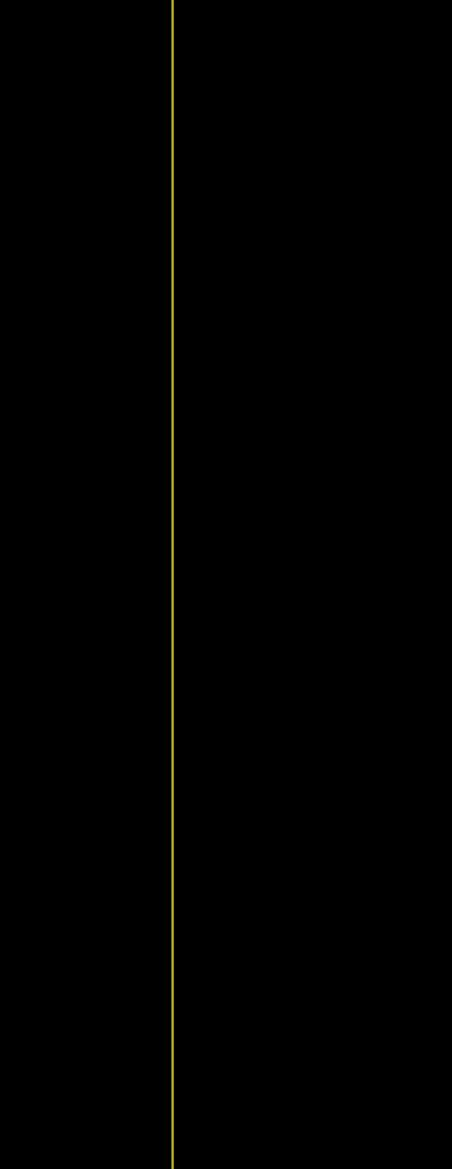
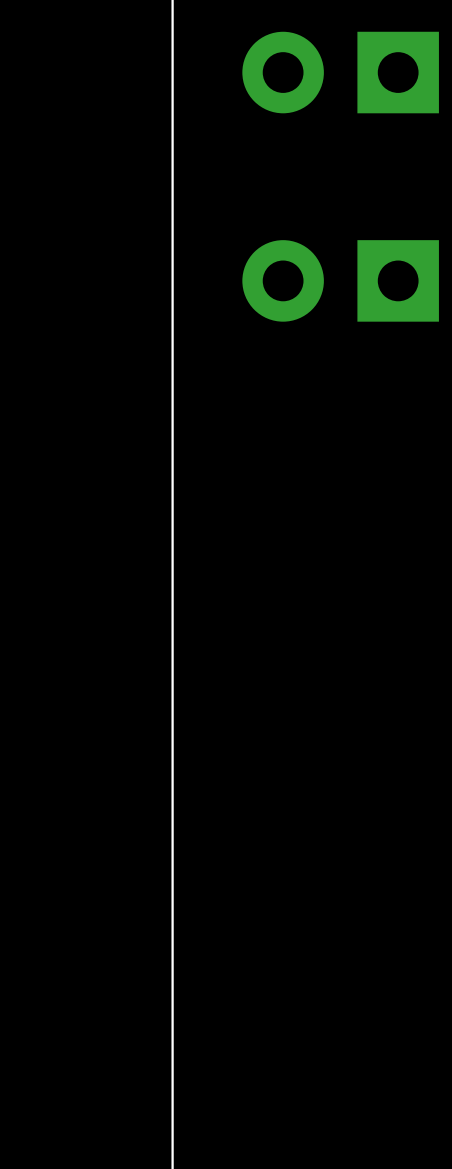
part: none -> (340, 72)
part: none -> (340, 280)

